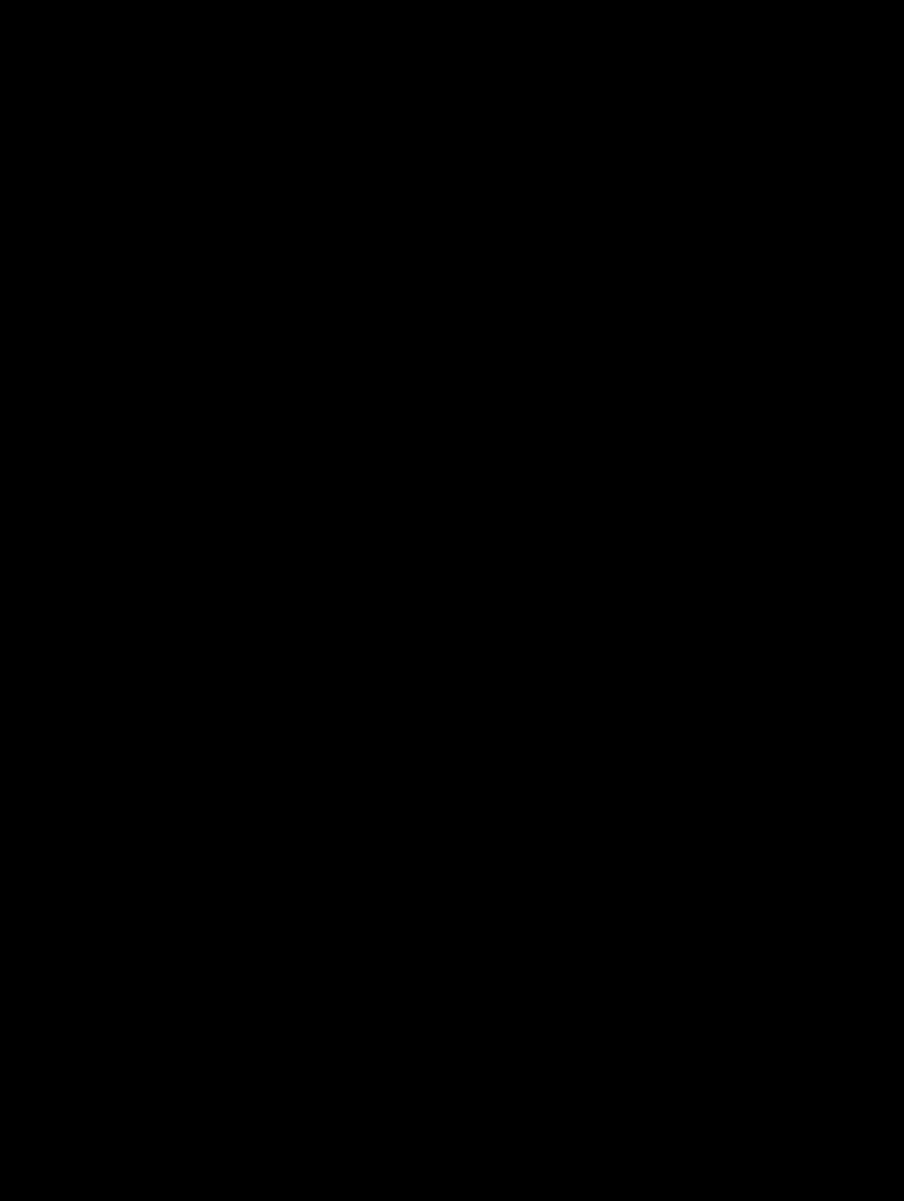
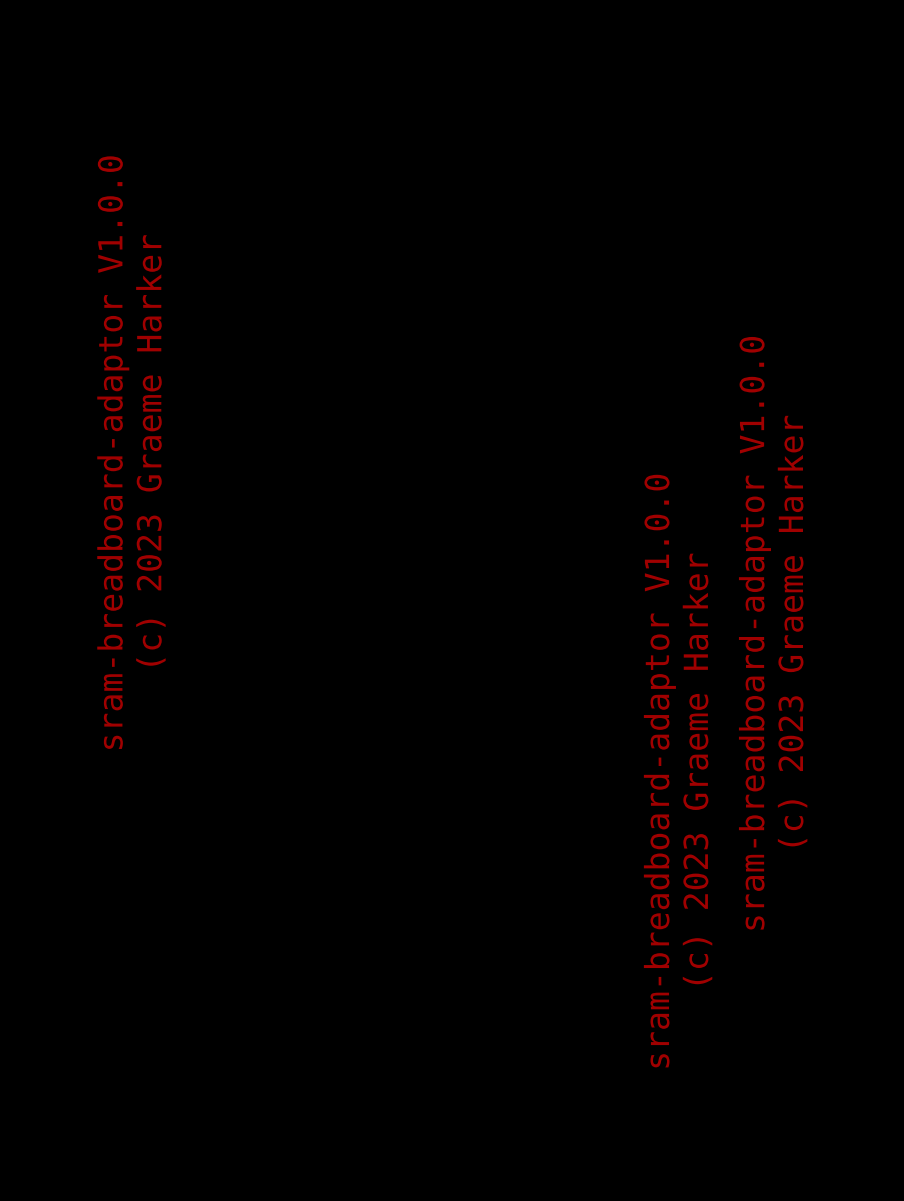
text: none -> (c) 2023 Graeme Harker (150, 450)
text: none -> sram-breadboard-adaptor V1.0.0 (113, 452)
text: none -> (c) 2023 Graeme Harker (792, 631)
text: none -> sram-breadboard-adaptor V1.0.0 (754, 633)
text: none -> (c) 2023 Graeme Harker (697, 768)
text: none -> sram-breadboard-adaptor V1.0.0 (659, 771)

